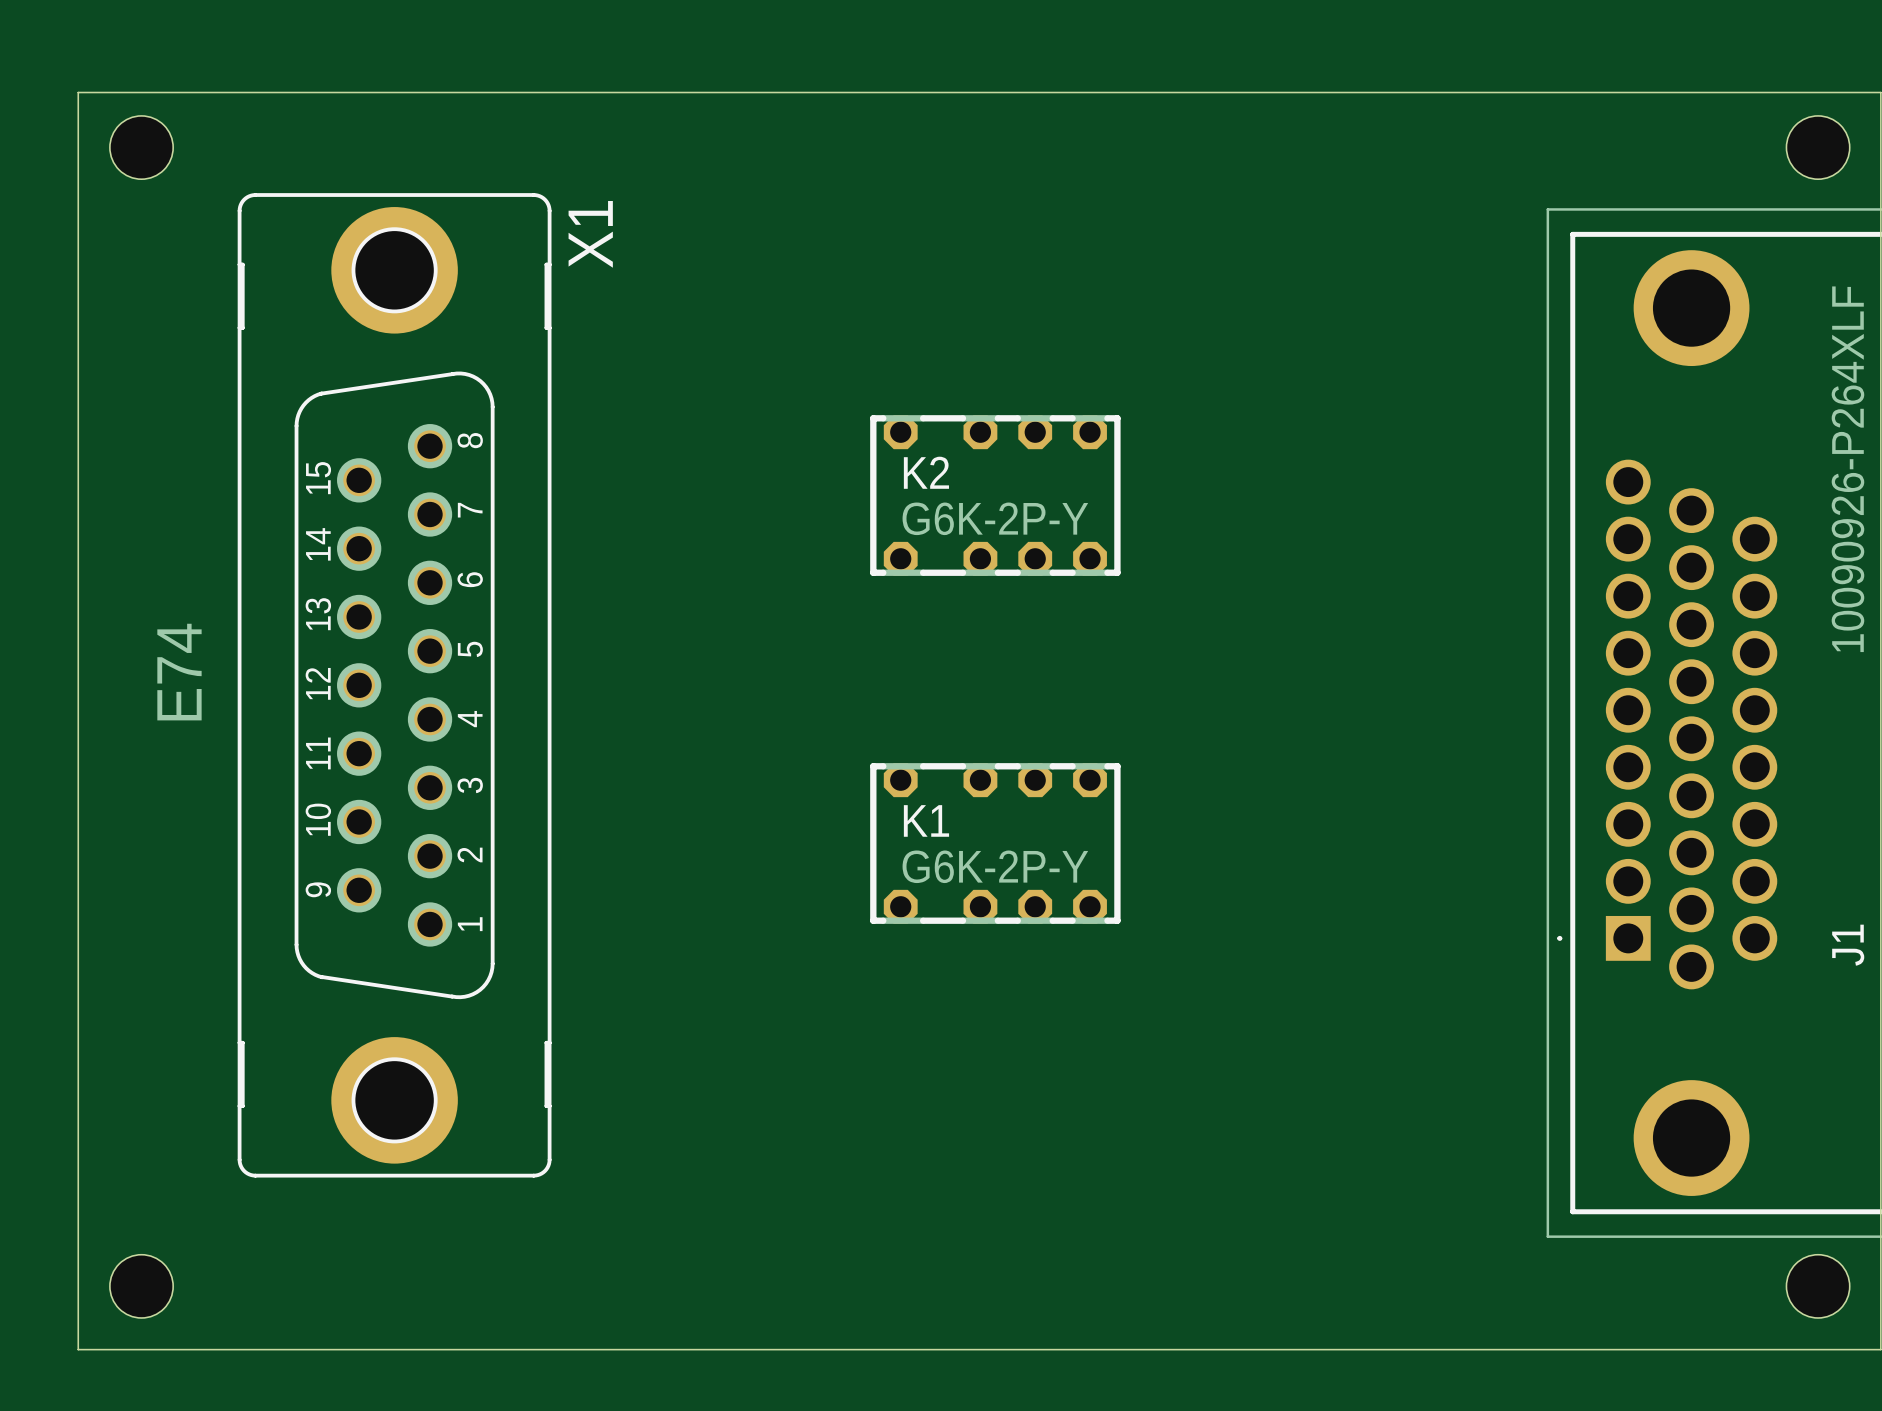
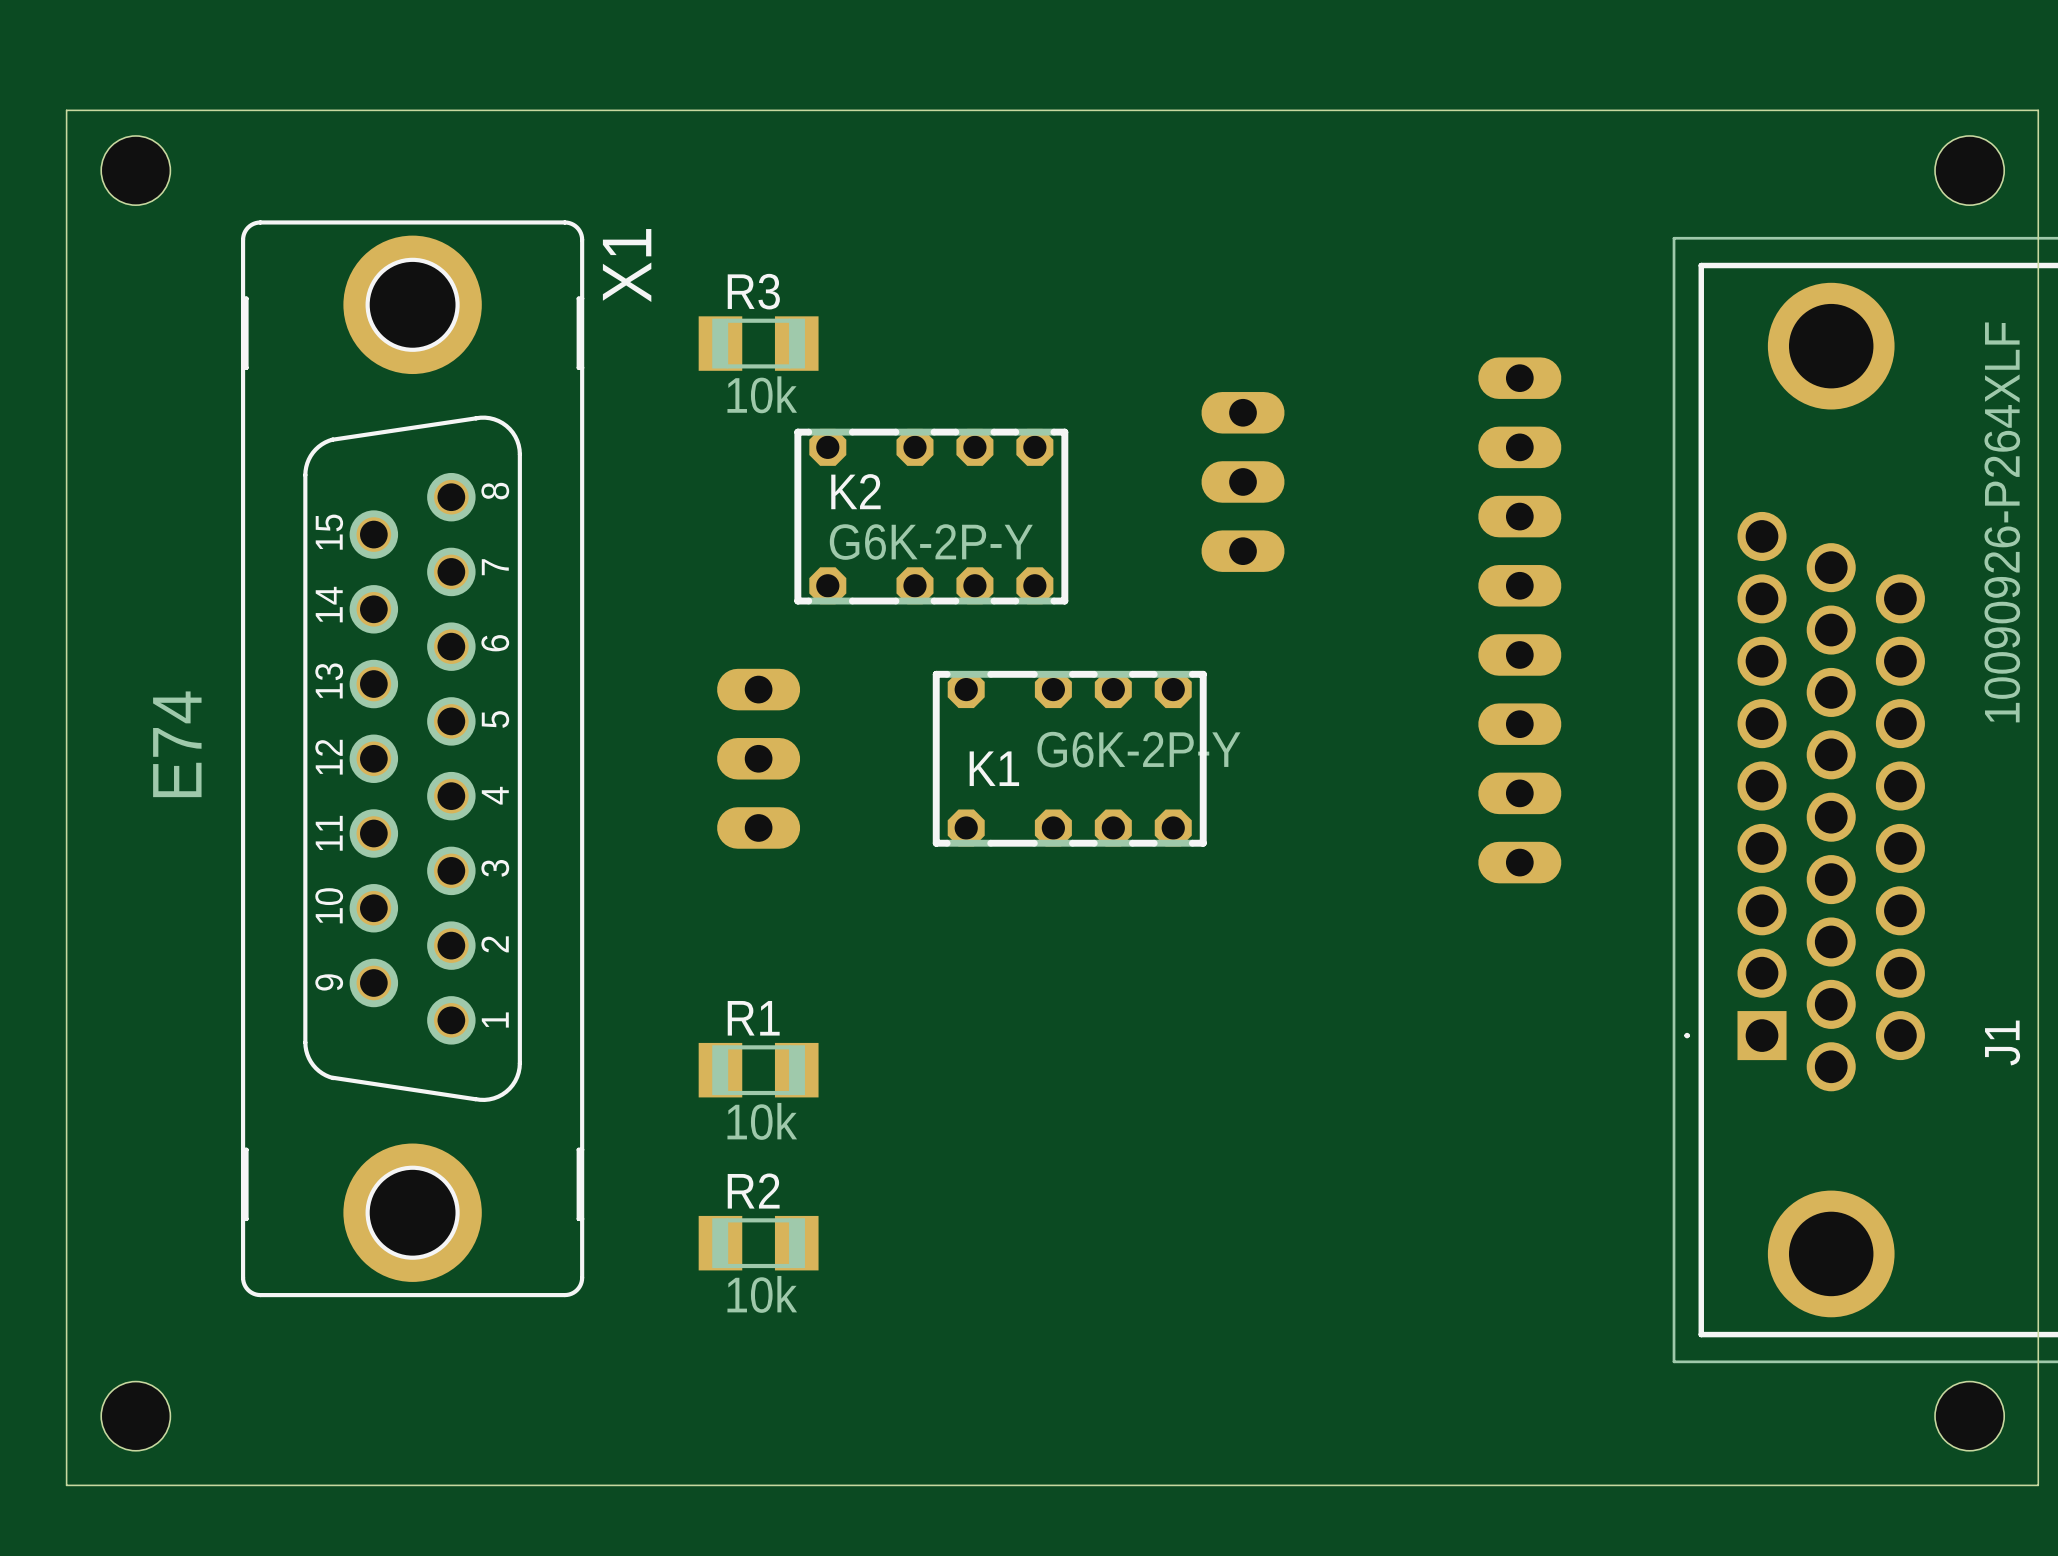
R3: none -> 10k (758, 343)
part: none -> (1243, 481)
K2 position: (995, 495) -> (931, 516)
part: none -> (1519, 620)
part: none -> (758, 758)
K1 name position: K1 (926, 820) -> K1 (994, 768)
K1 position: (995, 843) -> (1069, 758)
K1 value position: G6K-2P-Y (995, 866) -> G6K-2P-Y (1138, 749)
R1: none -> 10k (758, 1070)
R2: none -> 10k (758, 1243)

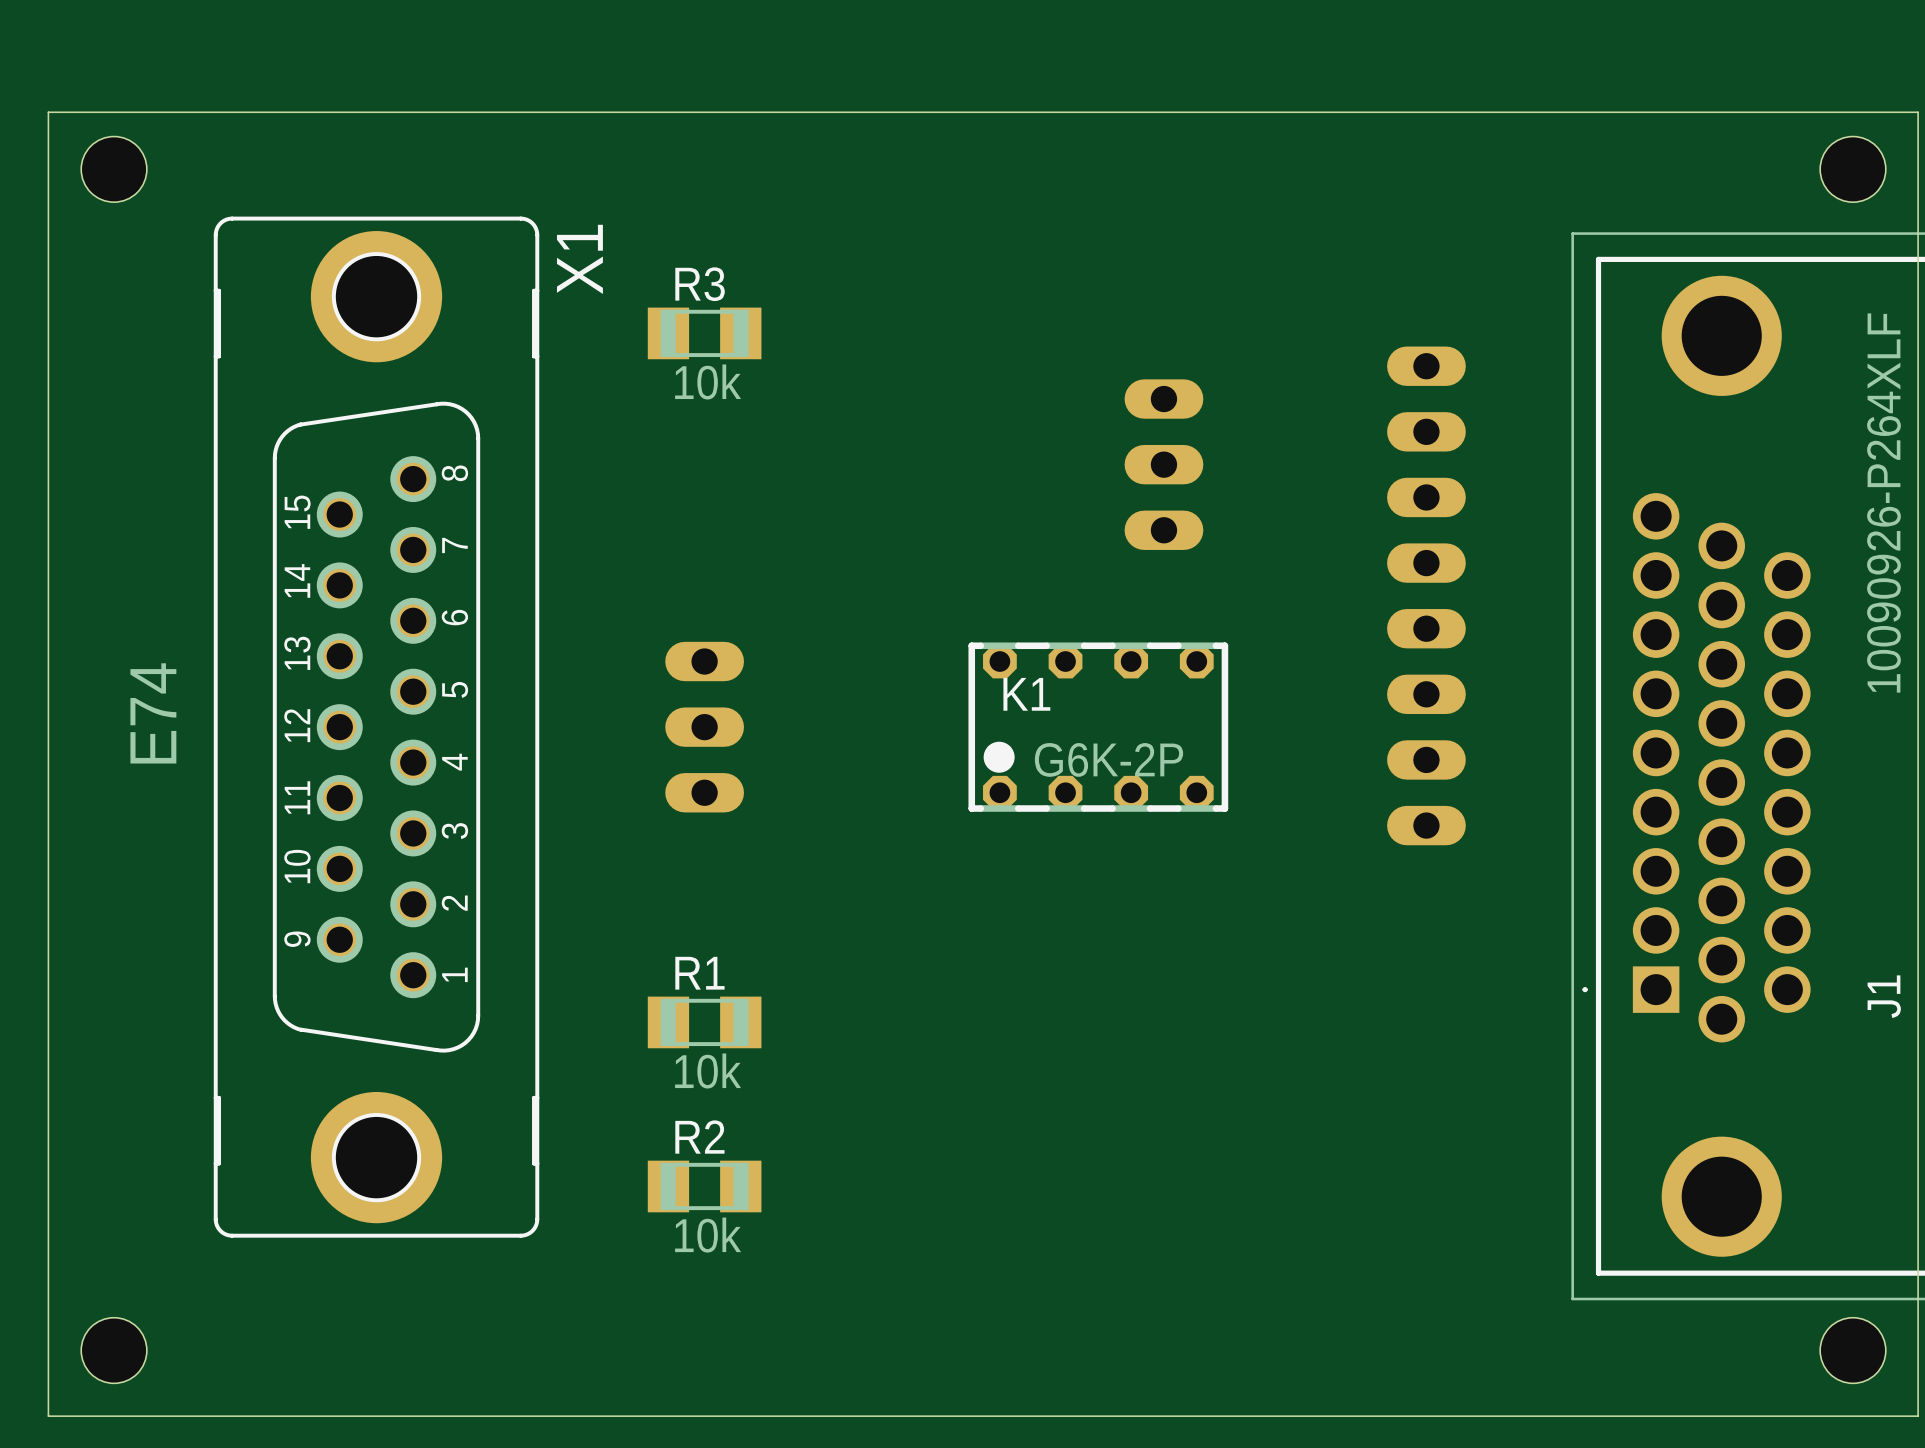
K2: G6K-2P-Y (931, 516) -> none
K1 footprint: [932, 670, 1207, 847] -> [968, 642, 1229, 812]
K1 value: G6K-2P-Y (1138, 749) -> G6K-2P (1109, 759)

